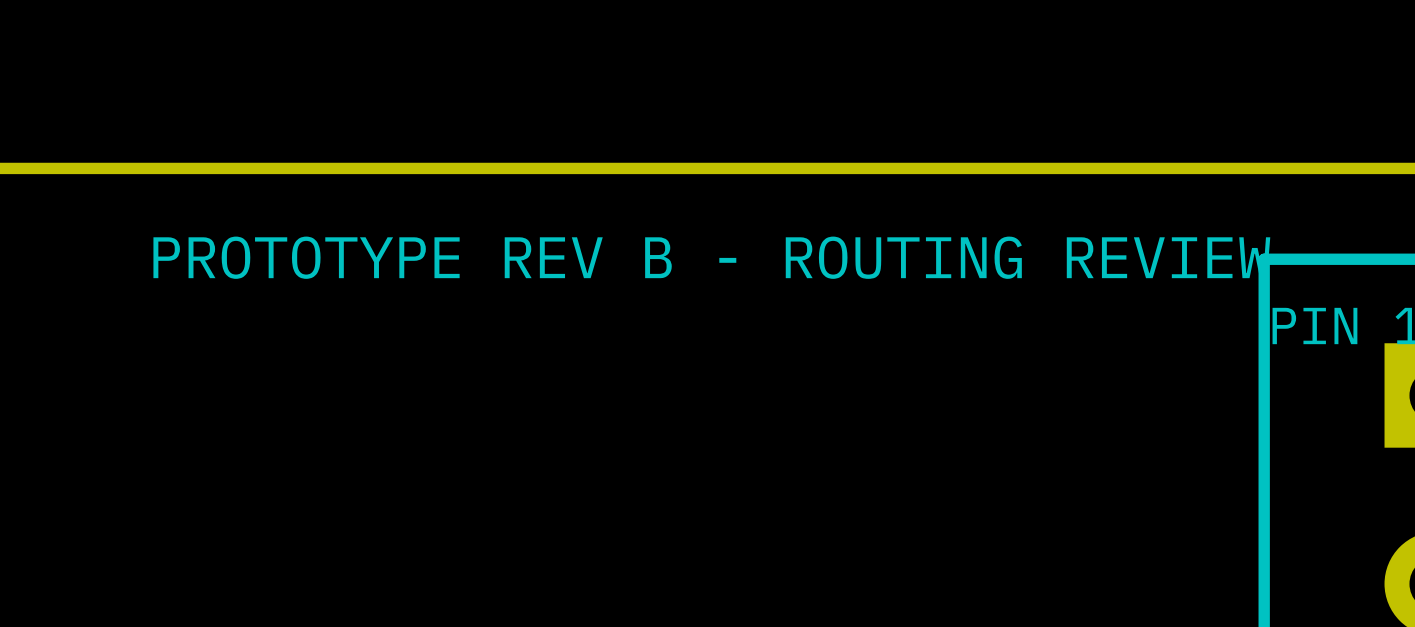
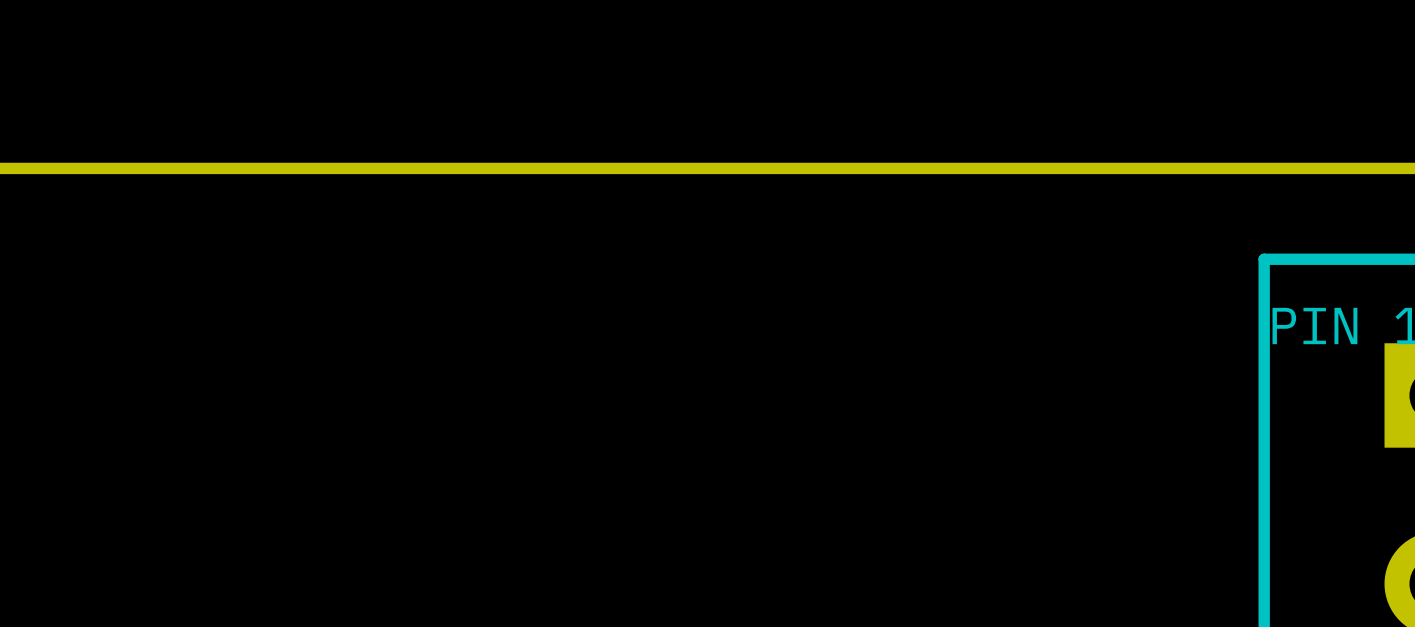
text: PROTOTYPE REV B - ROUTING REVIEW (711, 257) -> none

